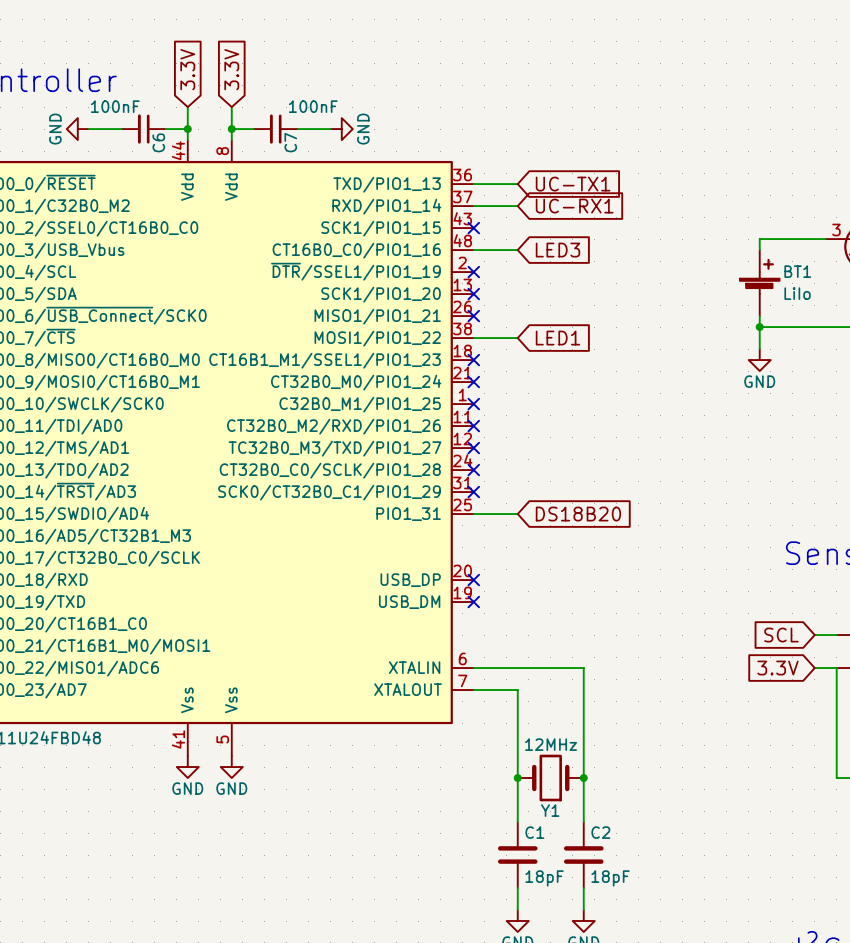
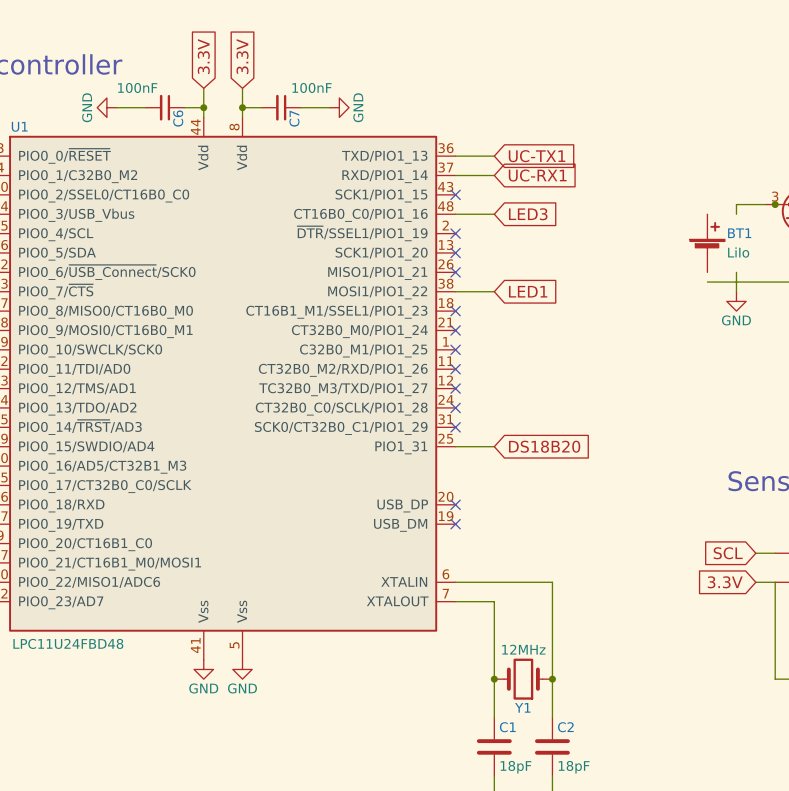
wire: (792, 239) (759, 239) (759, 250) -> (736, 204) (736, 214)
junction: none -> (775, 204)
wire: (759, 316) (759, 349) -> none
wire: none -> (736, 272) (736, 291)
junction: (759, 327) -> none
power symbol position: GND (759, 360) -> GND (736, 301)

